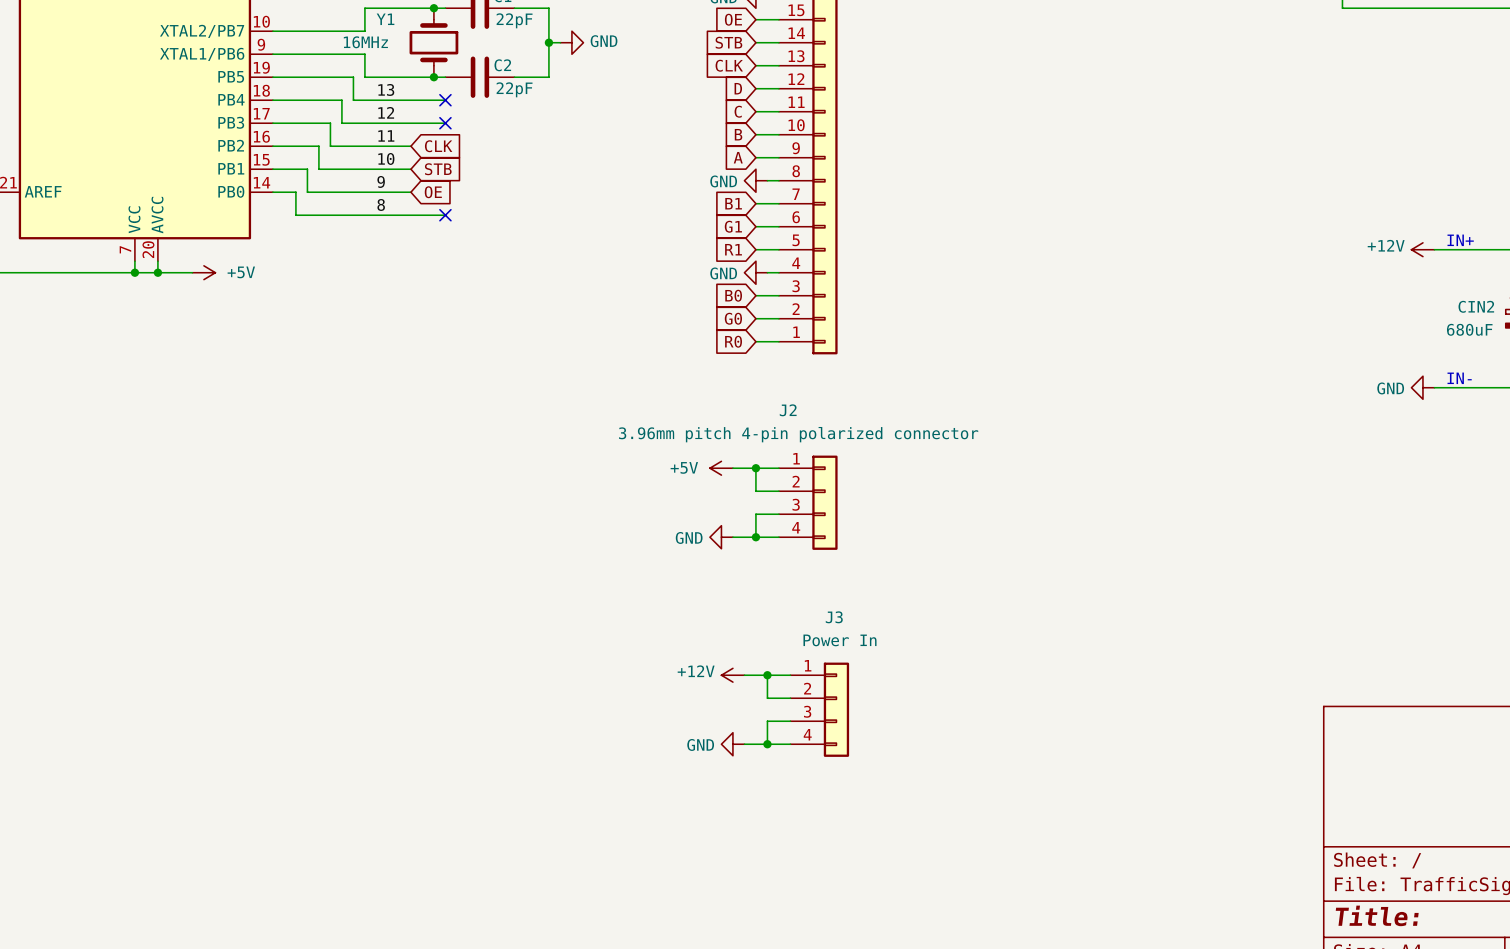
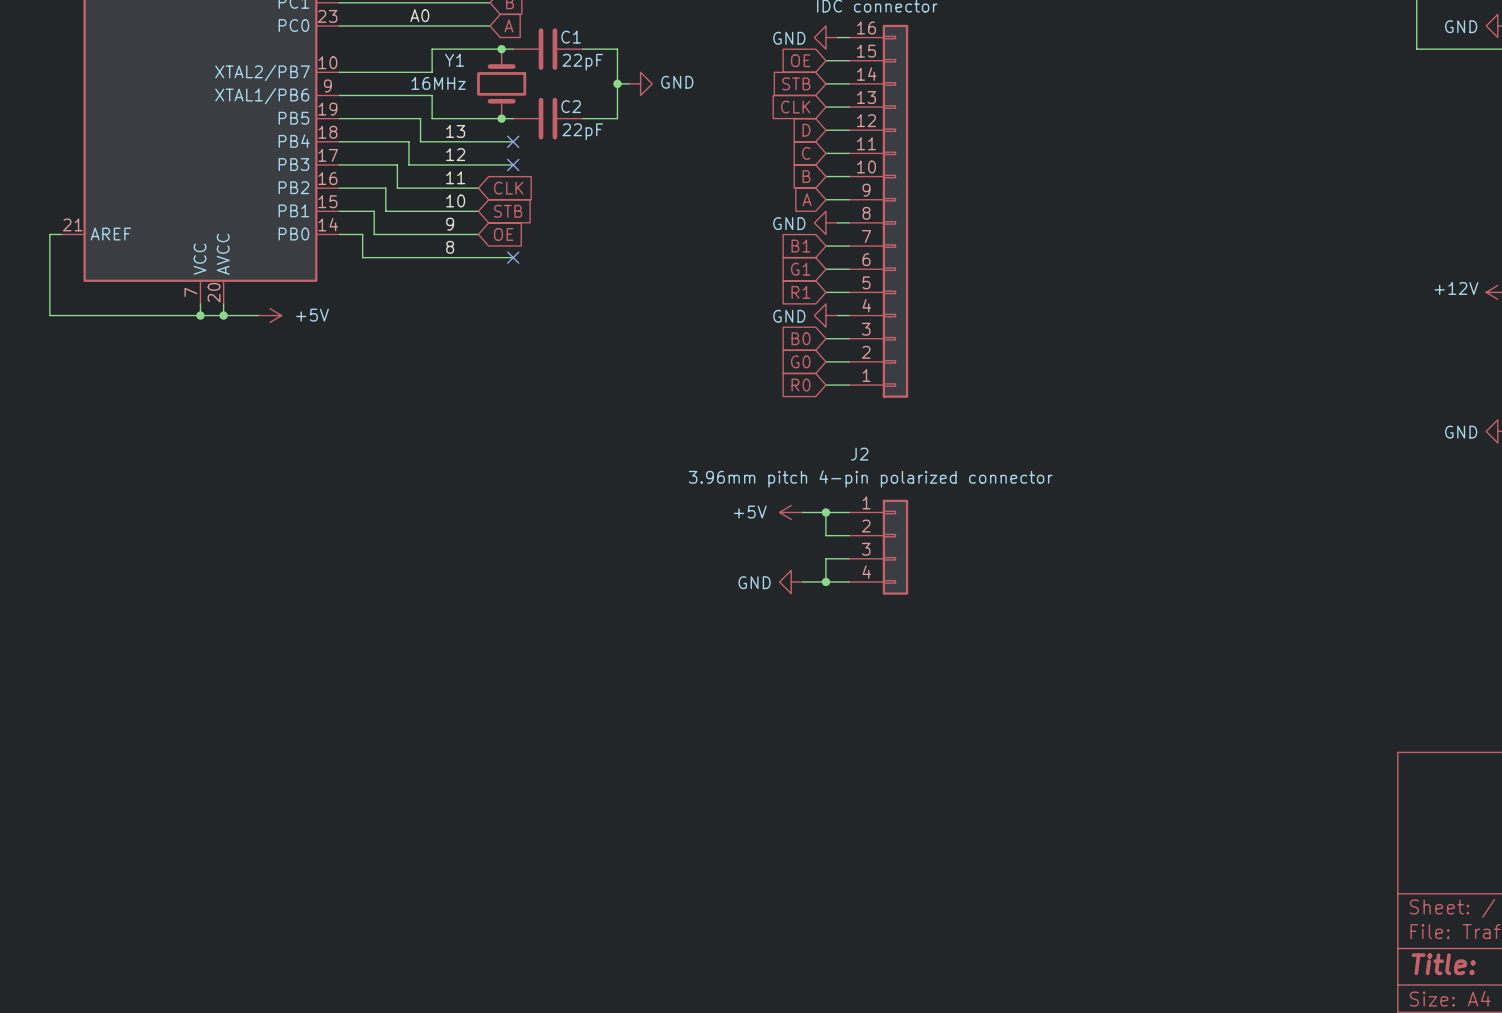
power symbol: +12V (732, 675) -> none
wire: (744, 675) (790, 675) -> none
wire: (767, 675) (767, 698) (790, 698) -> none
junction: (767, 675) -> none
J3: Power In (819, 709) -> none
wire: (790, 721) (767, 721) (767, 744) -> none
power symbol: GND (732, 744) -> none
wire: (744, 744) (790, 744) -> none
junction: (767, 744) -> none

